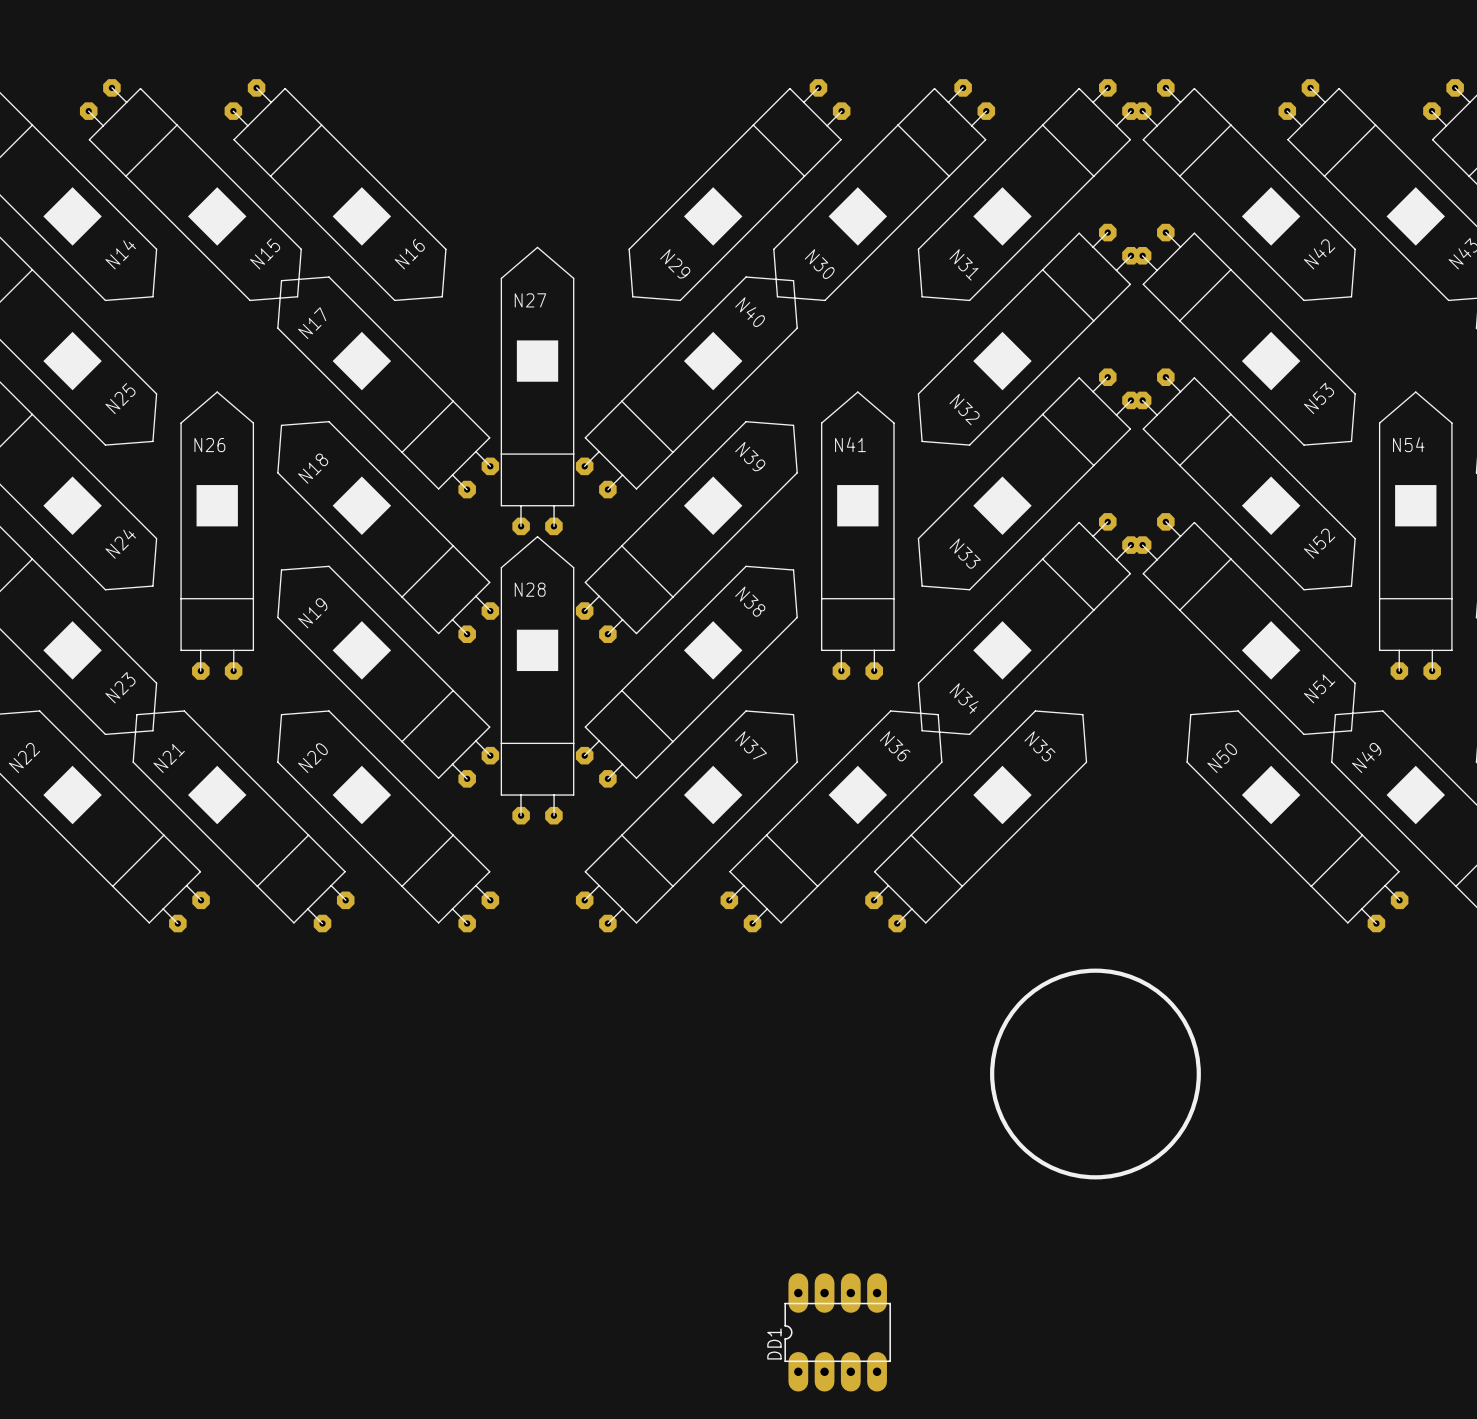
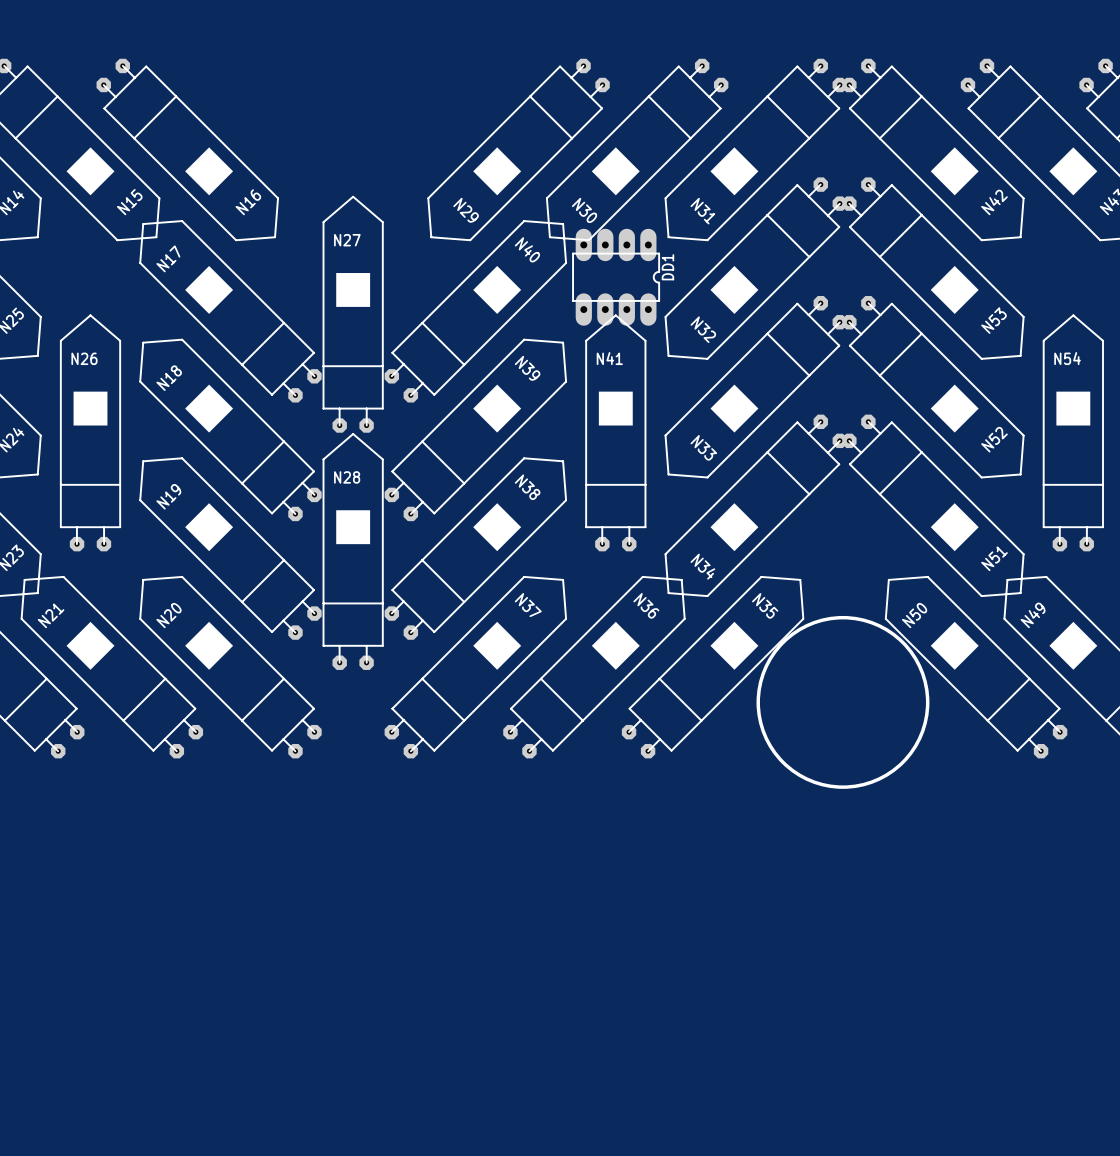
drawing position: (1095, 1074) -> (842, 702)
DD1 rotation: 0° (837, 1332) -> 180° (616, 277)
DD1 position: (837, 1332) -> (616, 277)

